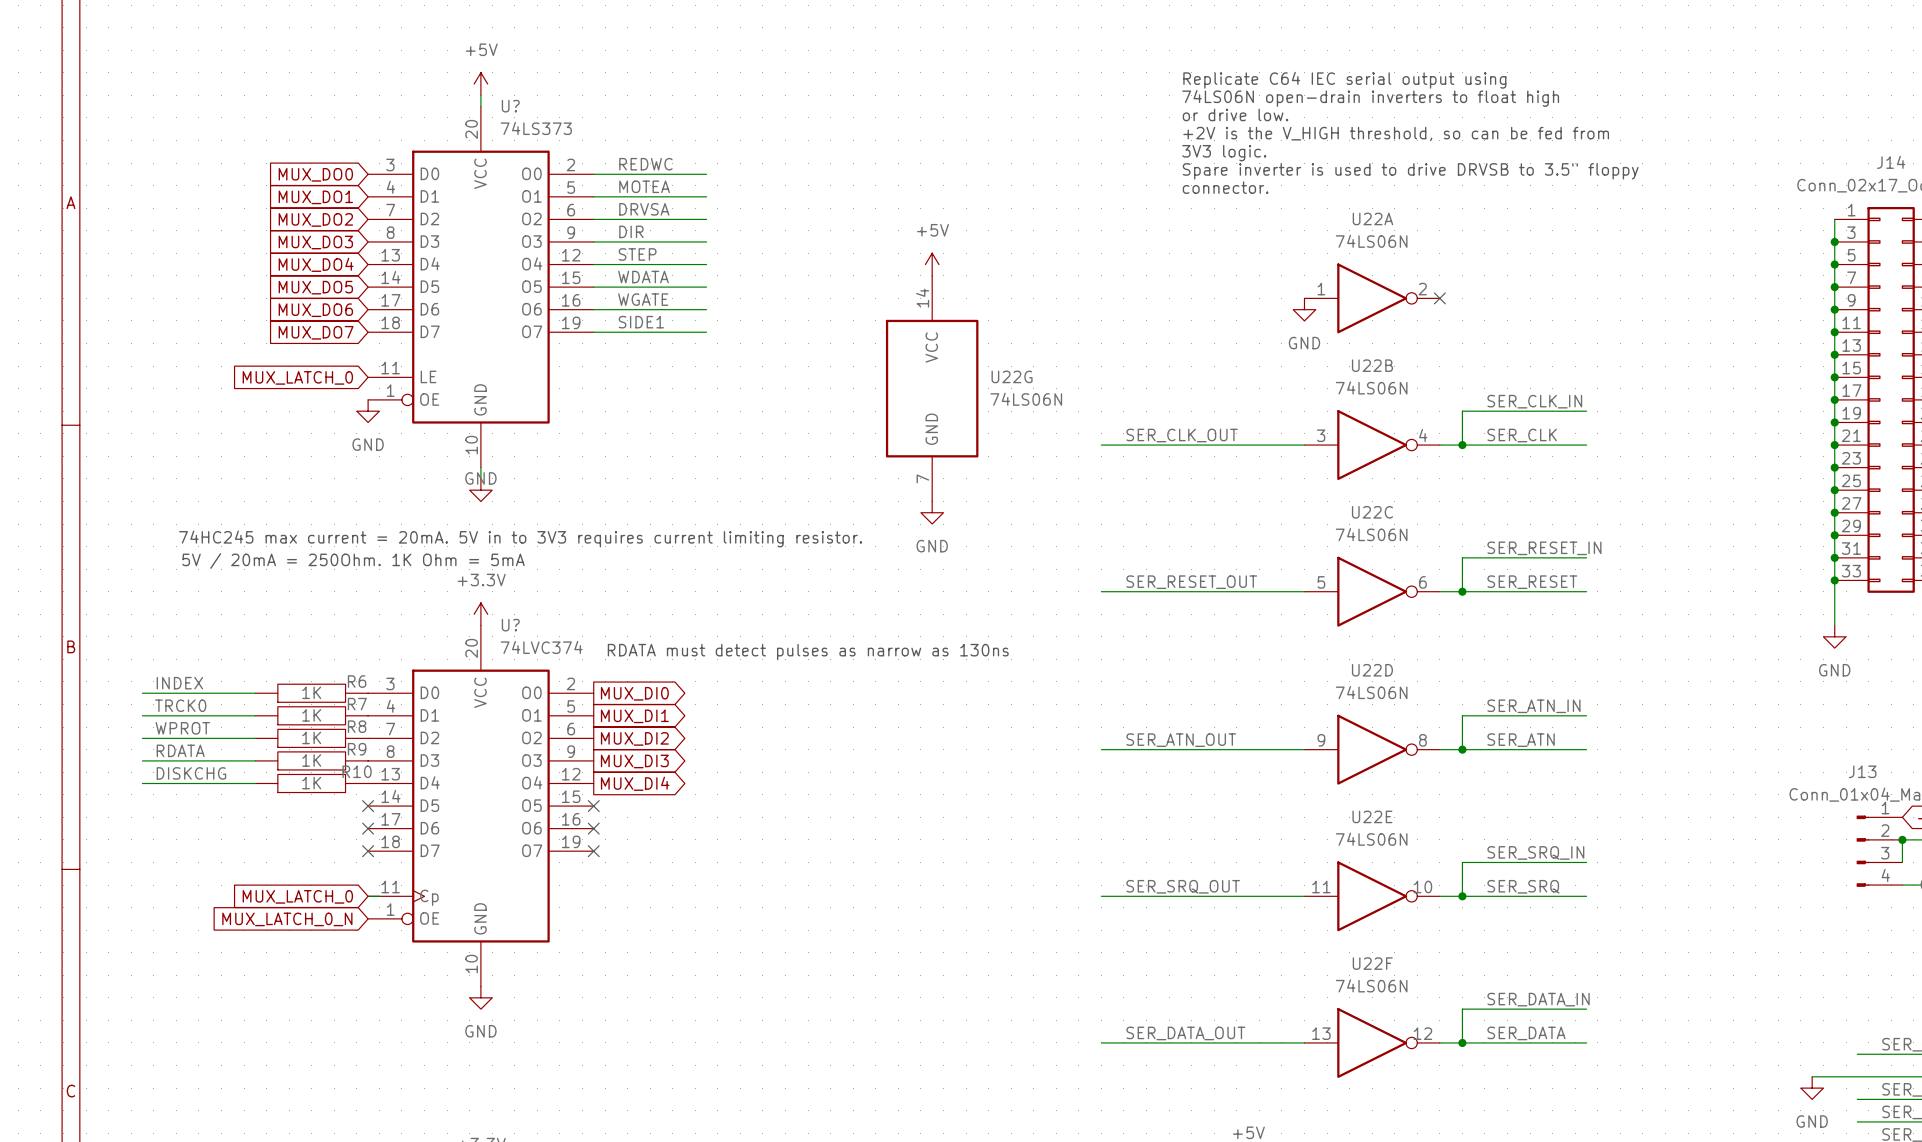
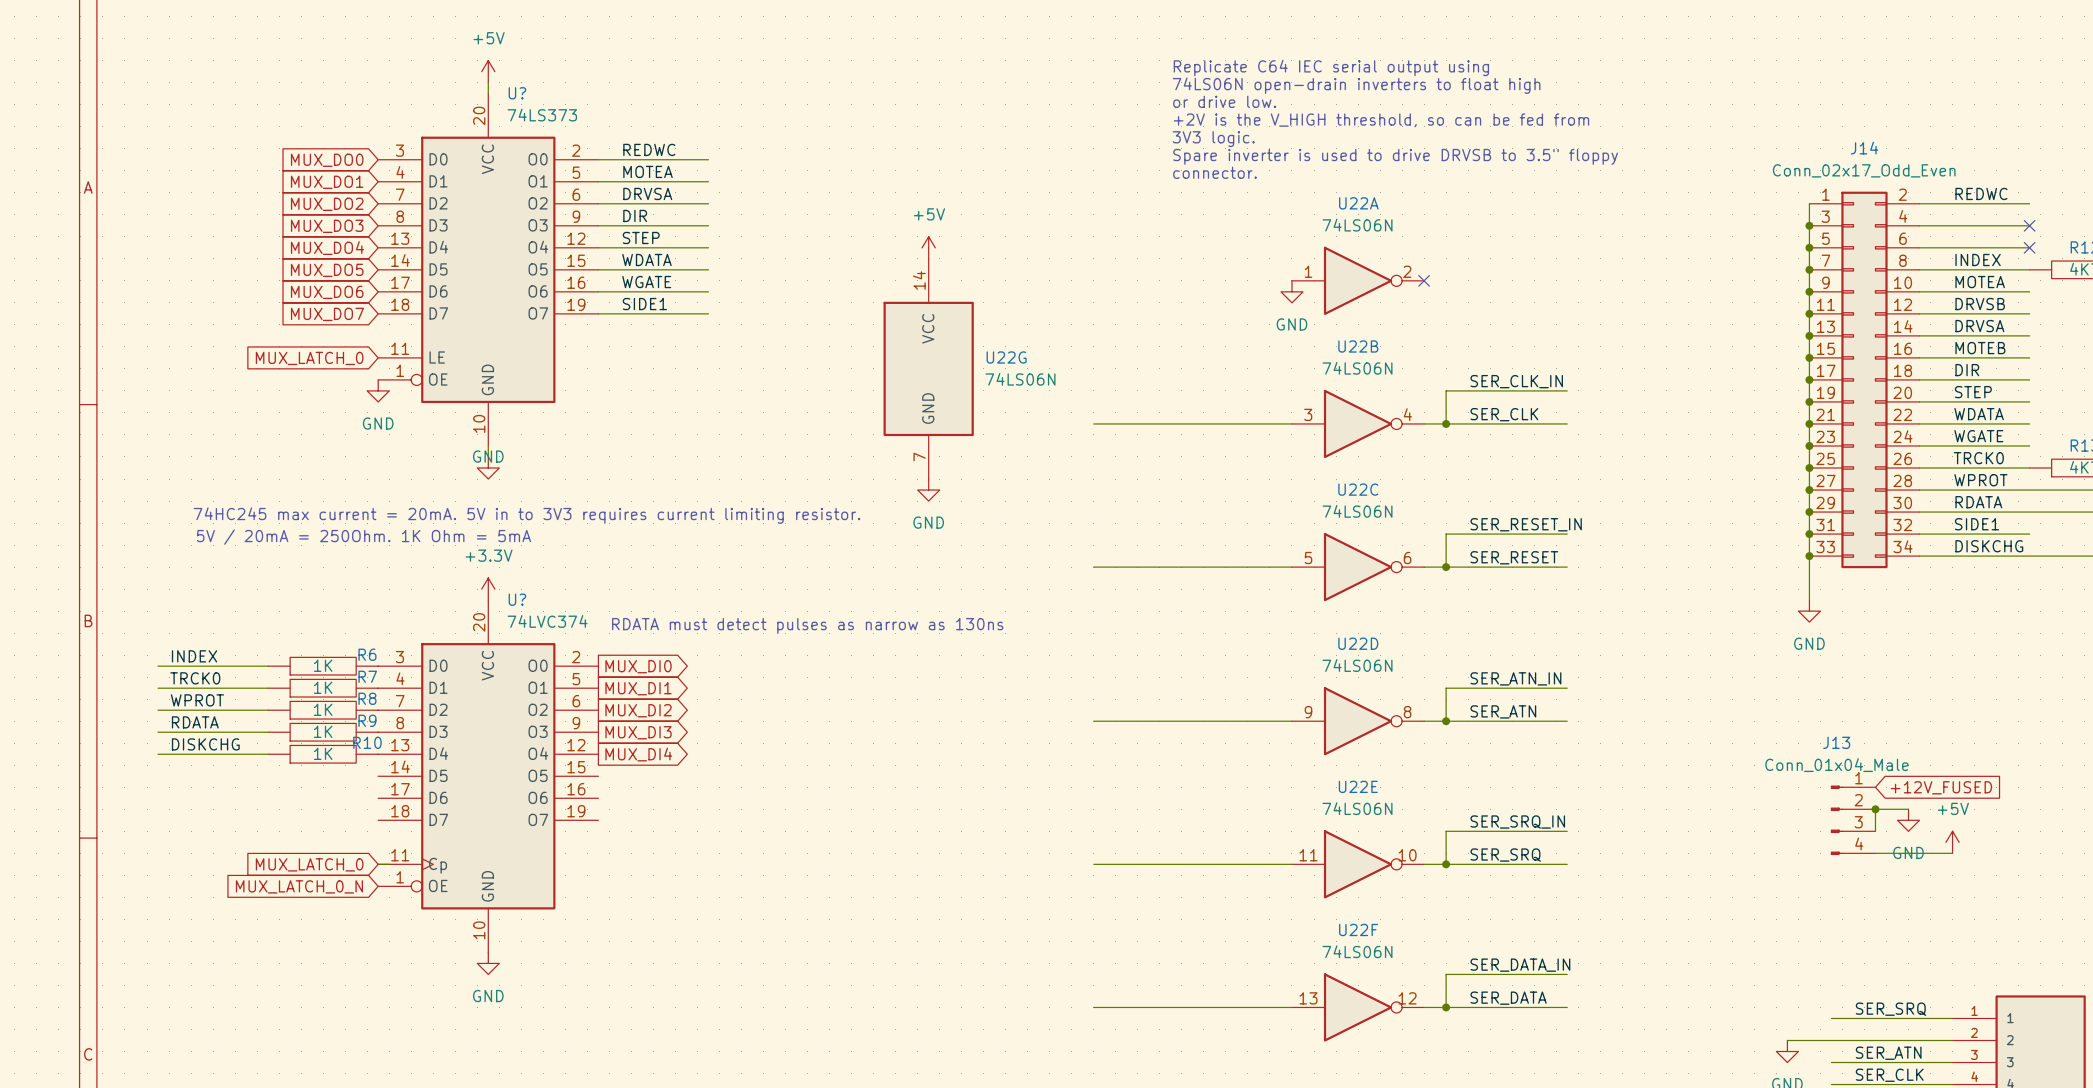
label: SER_CLK_OUT (1182, 435) -> none
label: SER_RESET_OUT (1191, 582) -> none
label: SER_ATN_OUT (1181, 740) -> none
no-connect mark: (368, 806) -> none
no-connect mark: (593, 806) -> none
no-connect mark: (368, 828) -> none
no-connect mark: (593, 828) -> none
no-connect mark: (368, 851) -> none
no-connect mark: (593, 851) -> none
label: SER_SRQ_OUT (1183, 886) -> none
label: SER_DATA_OUT (1185, 1033) -> none

